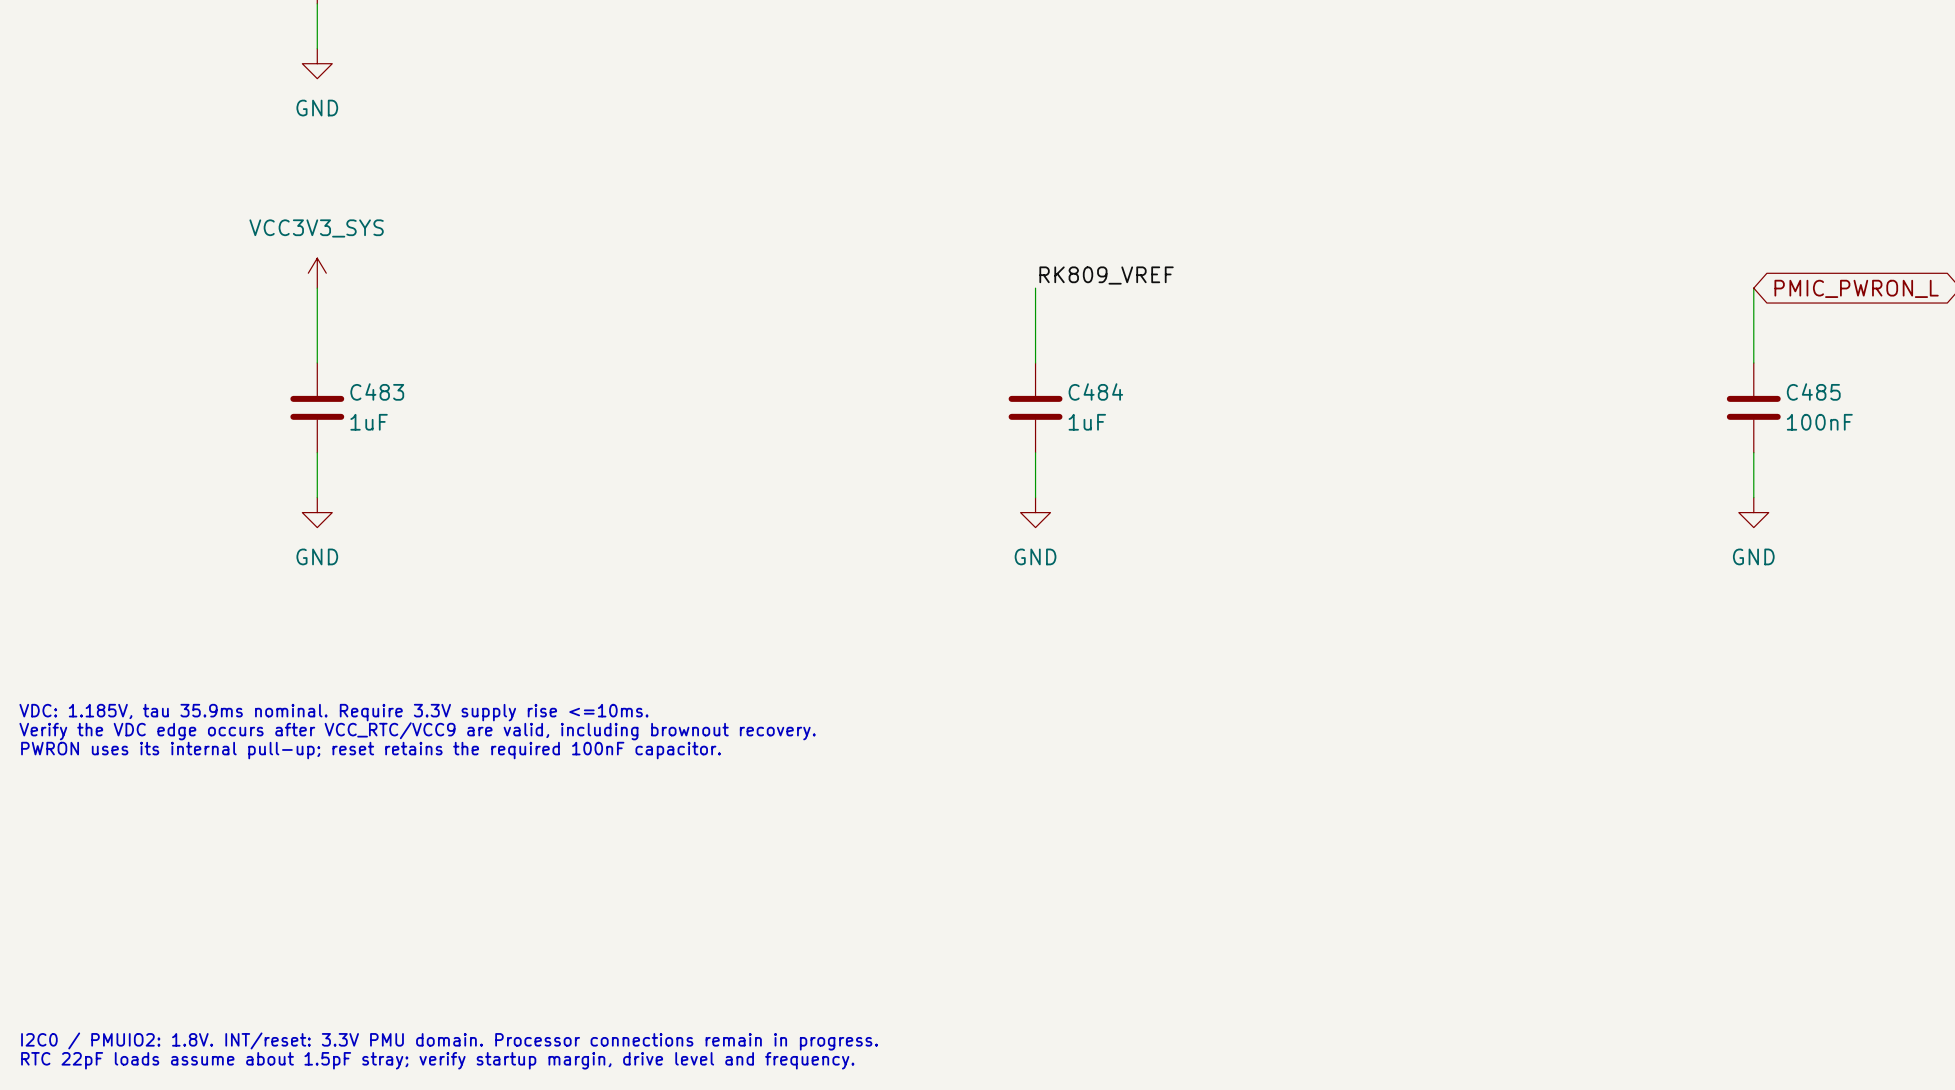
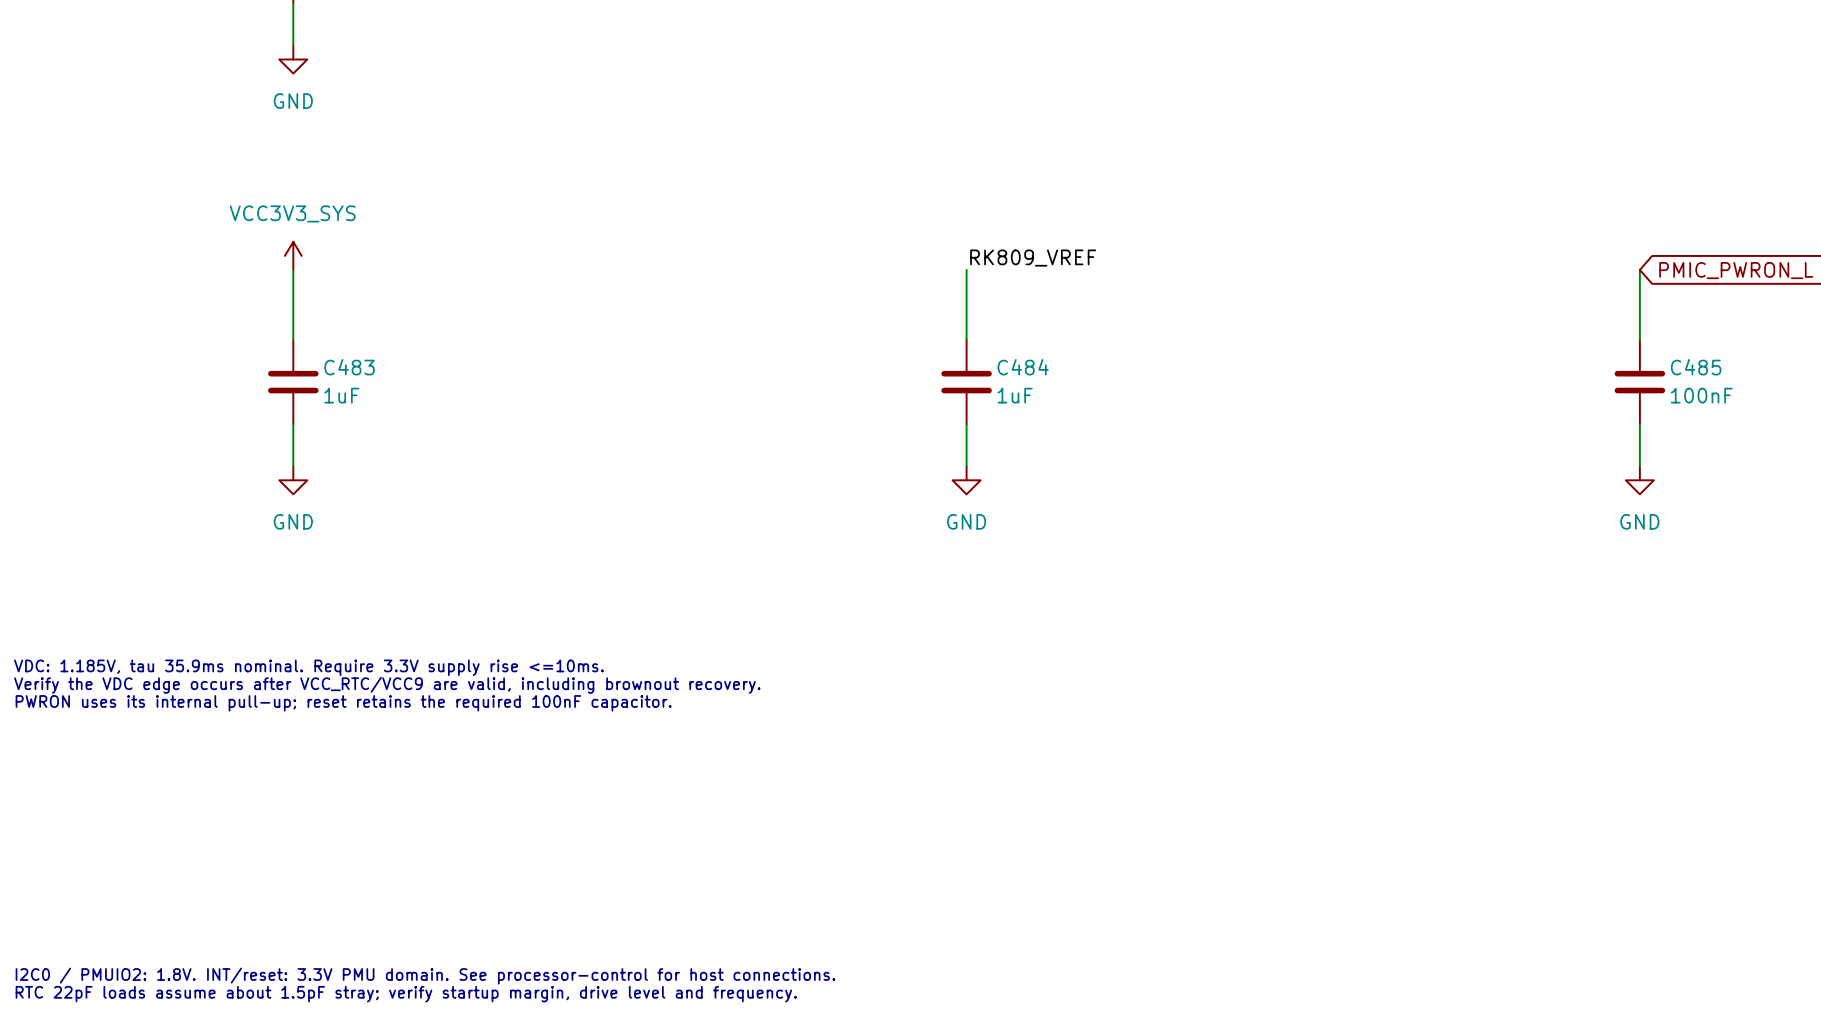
text: I2C0 / PMUIO2: 1.8V. INT/reset: 3.3V PMU domain. Processor connections remain in progress. (449, 1041) -> I2C0 / PMUIO2: 1.8V. INT/reset: 3.3V PMU domain. See processor-control for host connections. (425, 976)

